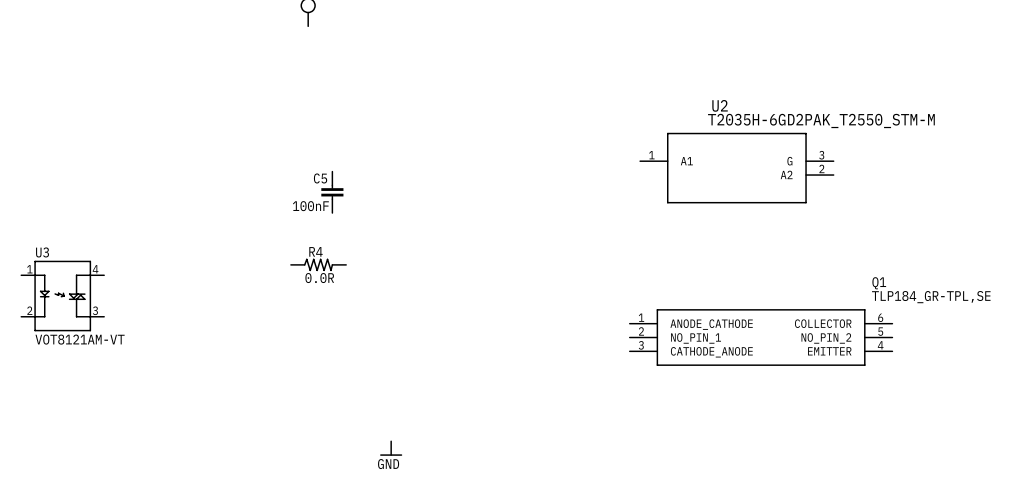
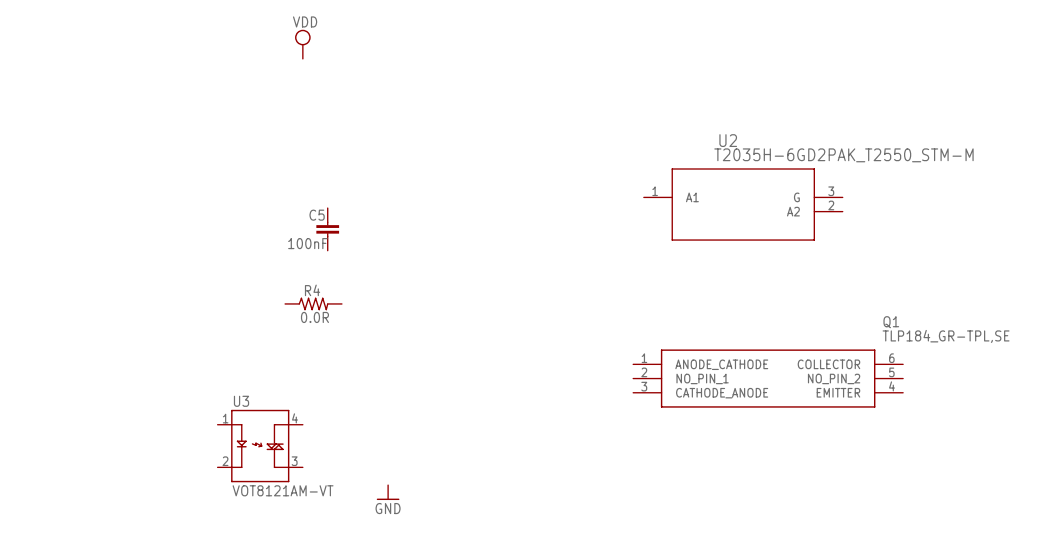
U3 position: (62, 296) -> (260, 446)

